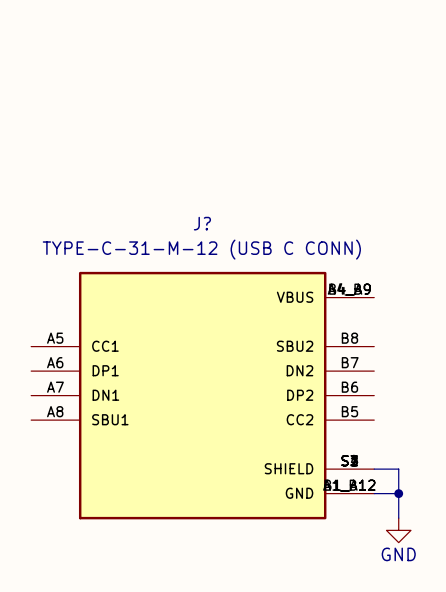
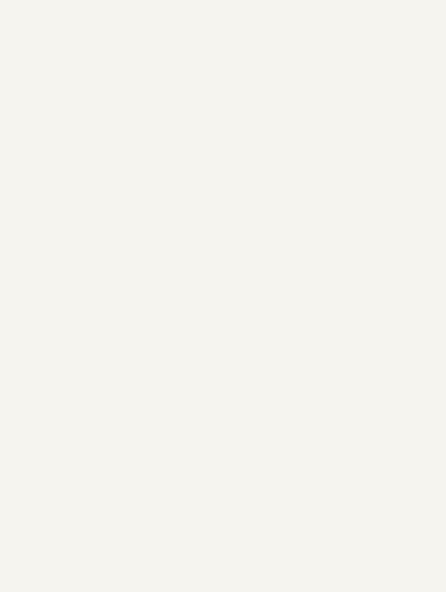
J?: TYPE-C-31-M-12 (USB C CONN) (202, 395) -> none
wire: (374, 469) (398, 469) (398, 518) -> none
wire: (374, 493) (398, 493) -> none
junction: (398, 493) -> none
power symbol: GND (398, 530) -> none

